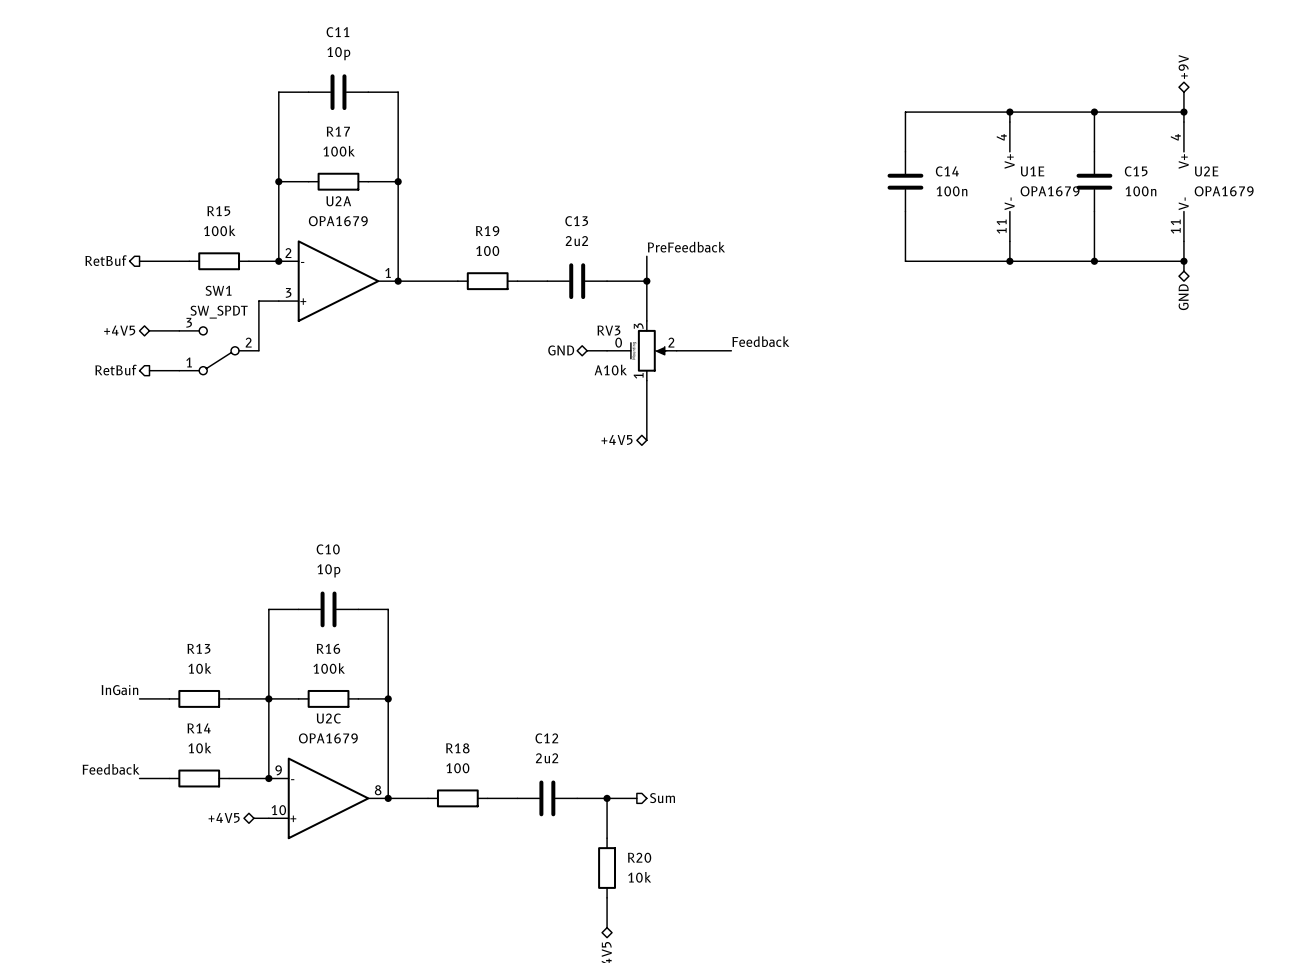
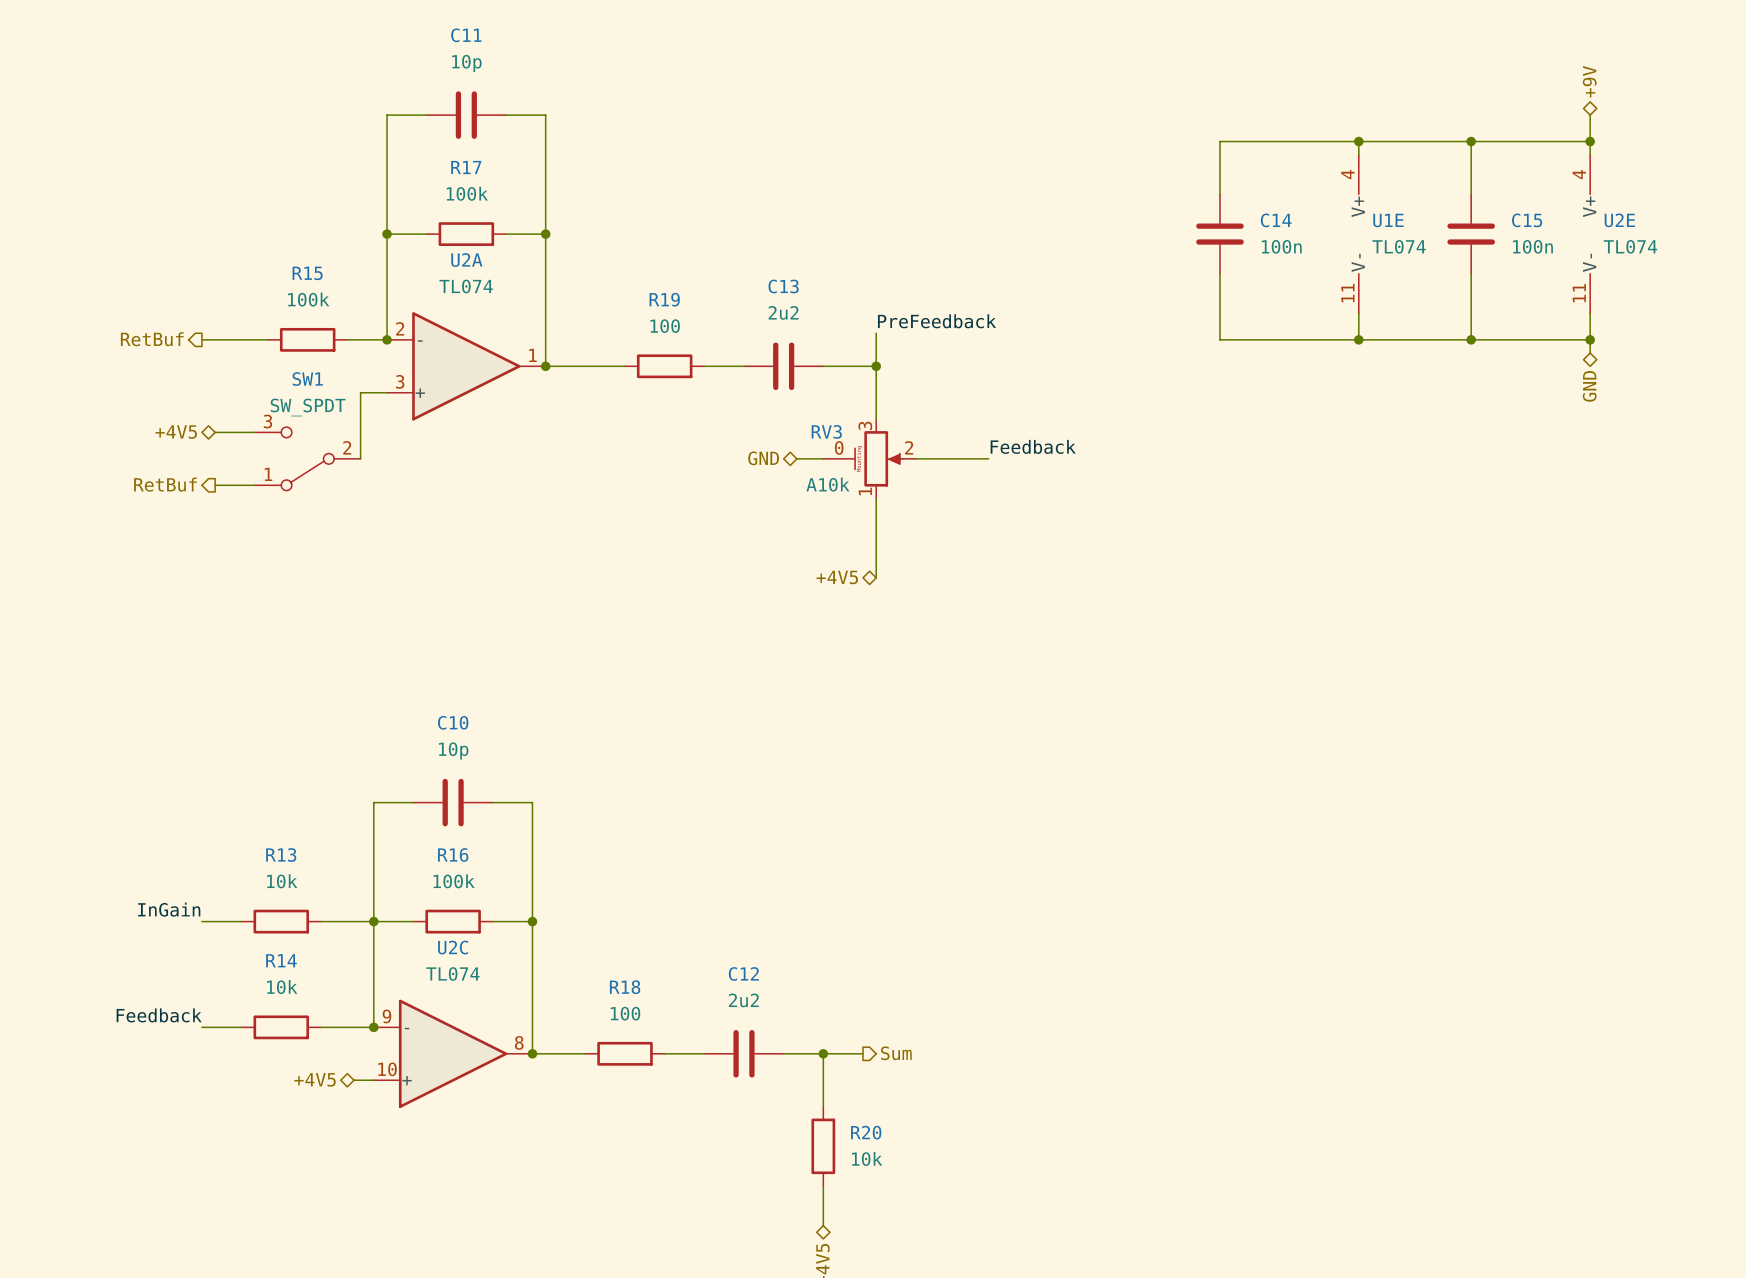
U1E value: OPA1679 (1050, 191) -> TL074 (1399, 246)
U2E value: OPA1679 (1224, 191) -> TL074 (1630, 246)
U2A value: OPA1679 (338, 221) -> TL074 (466, 286)
U2C value: OPA1679 (328, 738) -> TL074 (452, 973)

